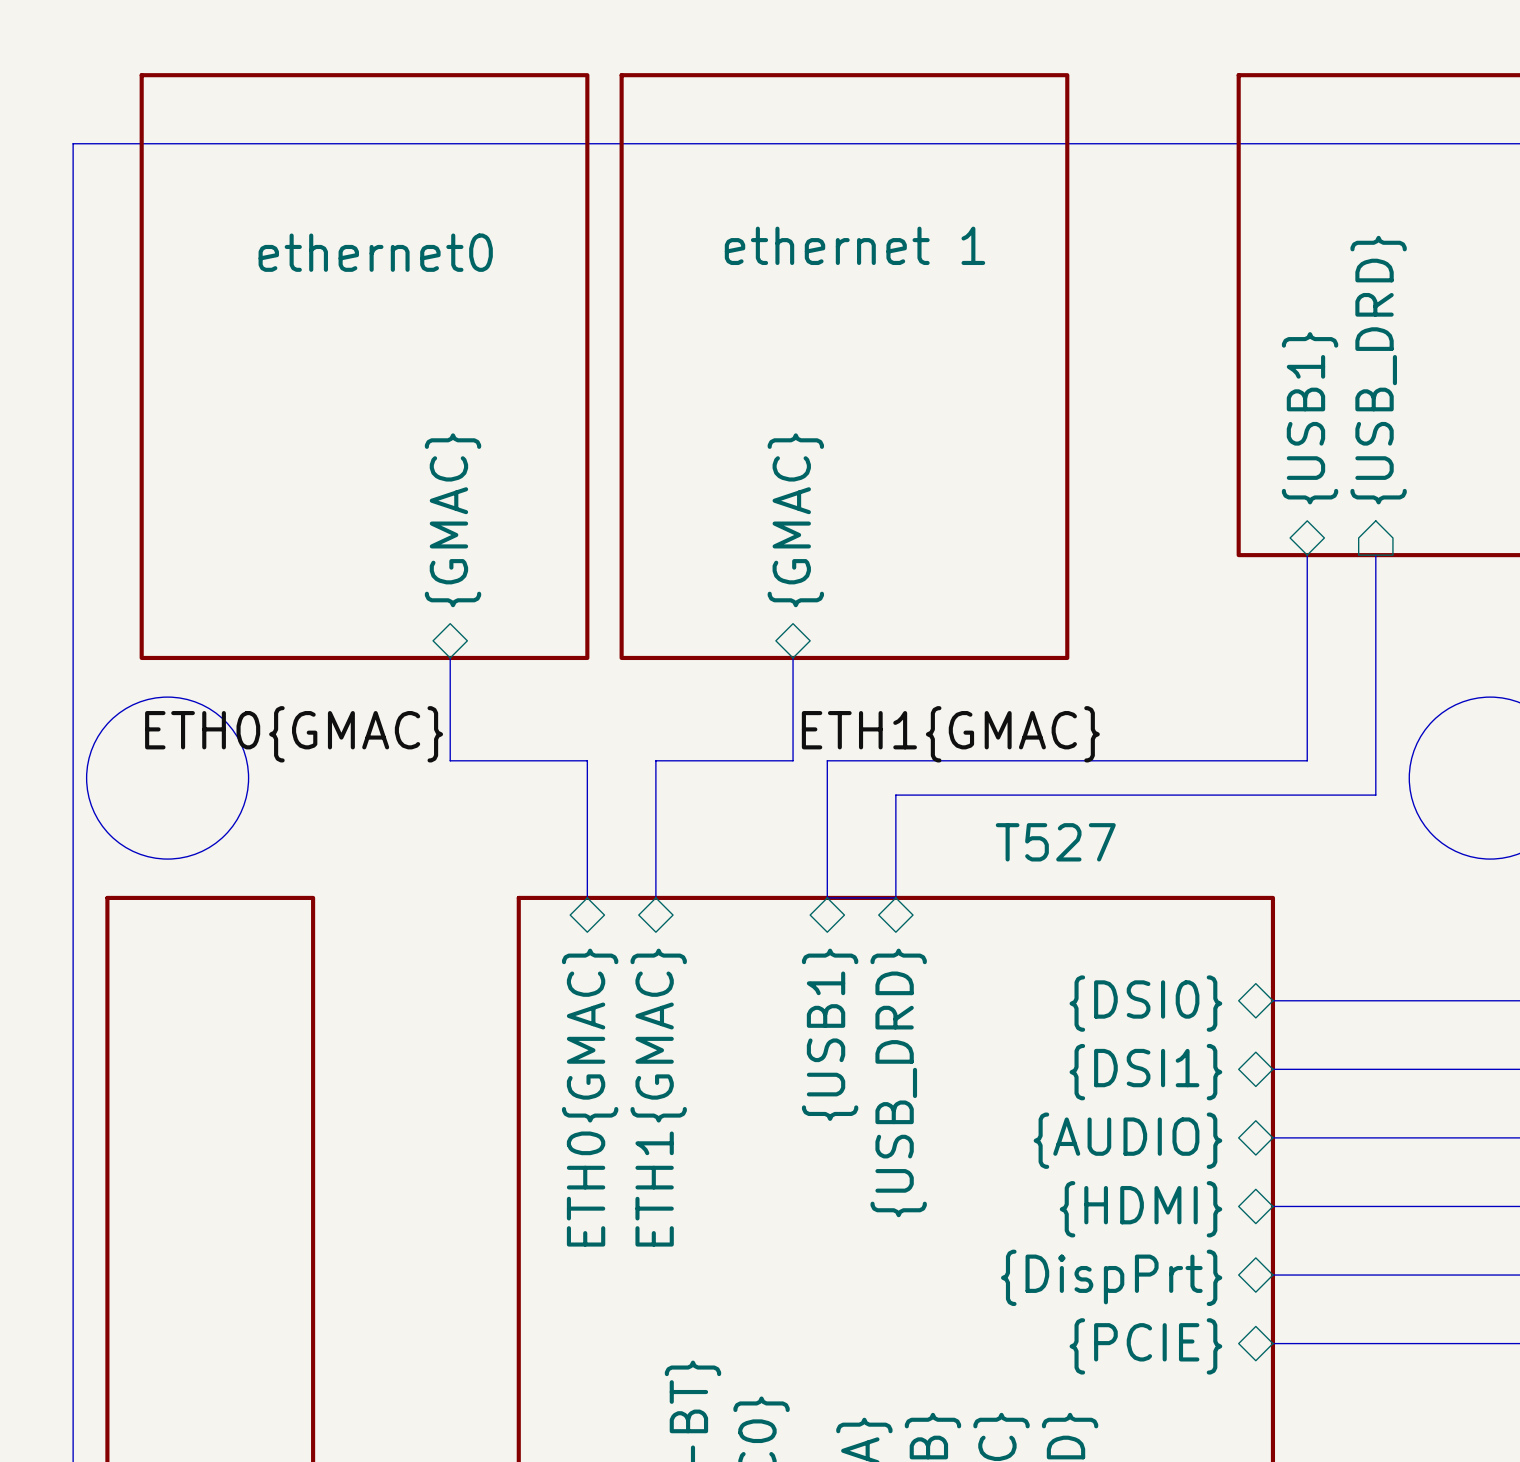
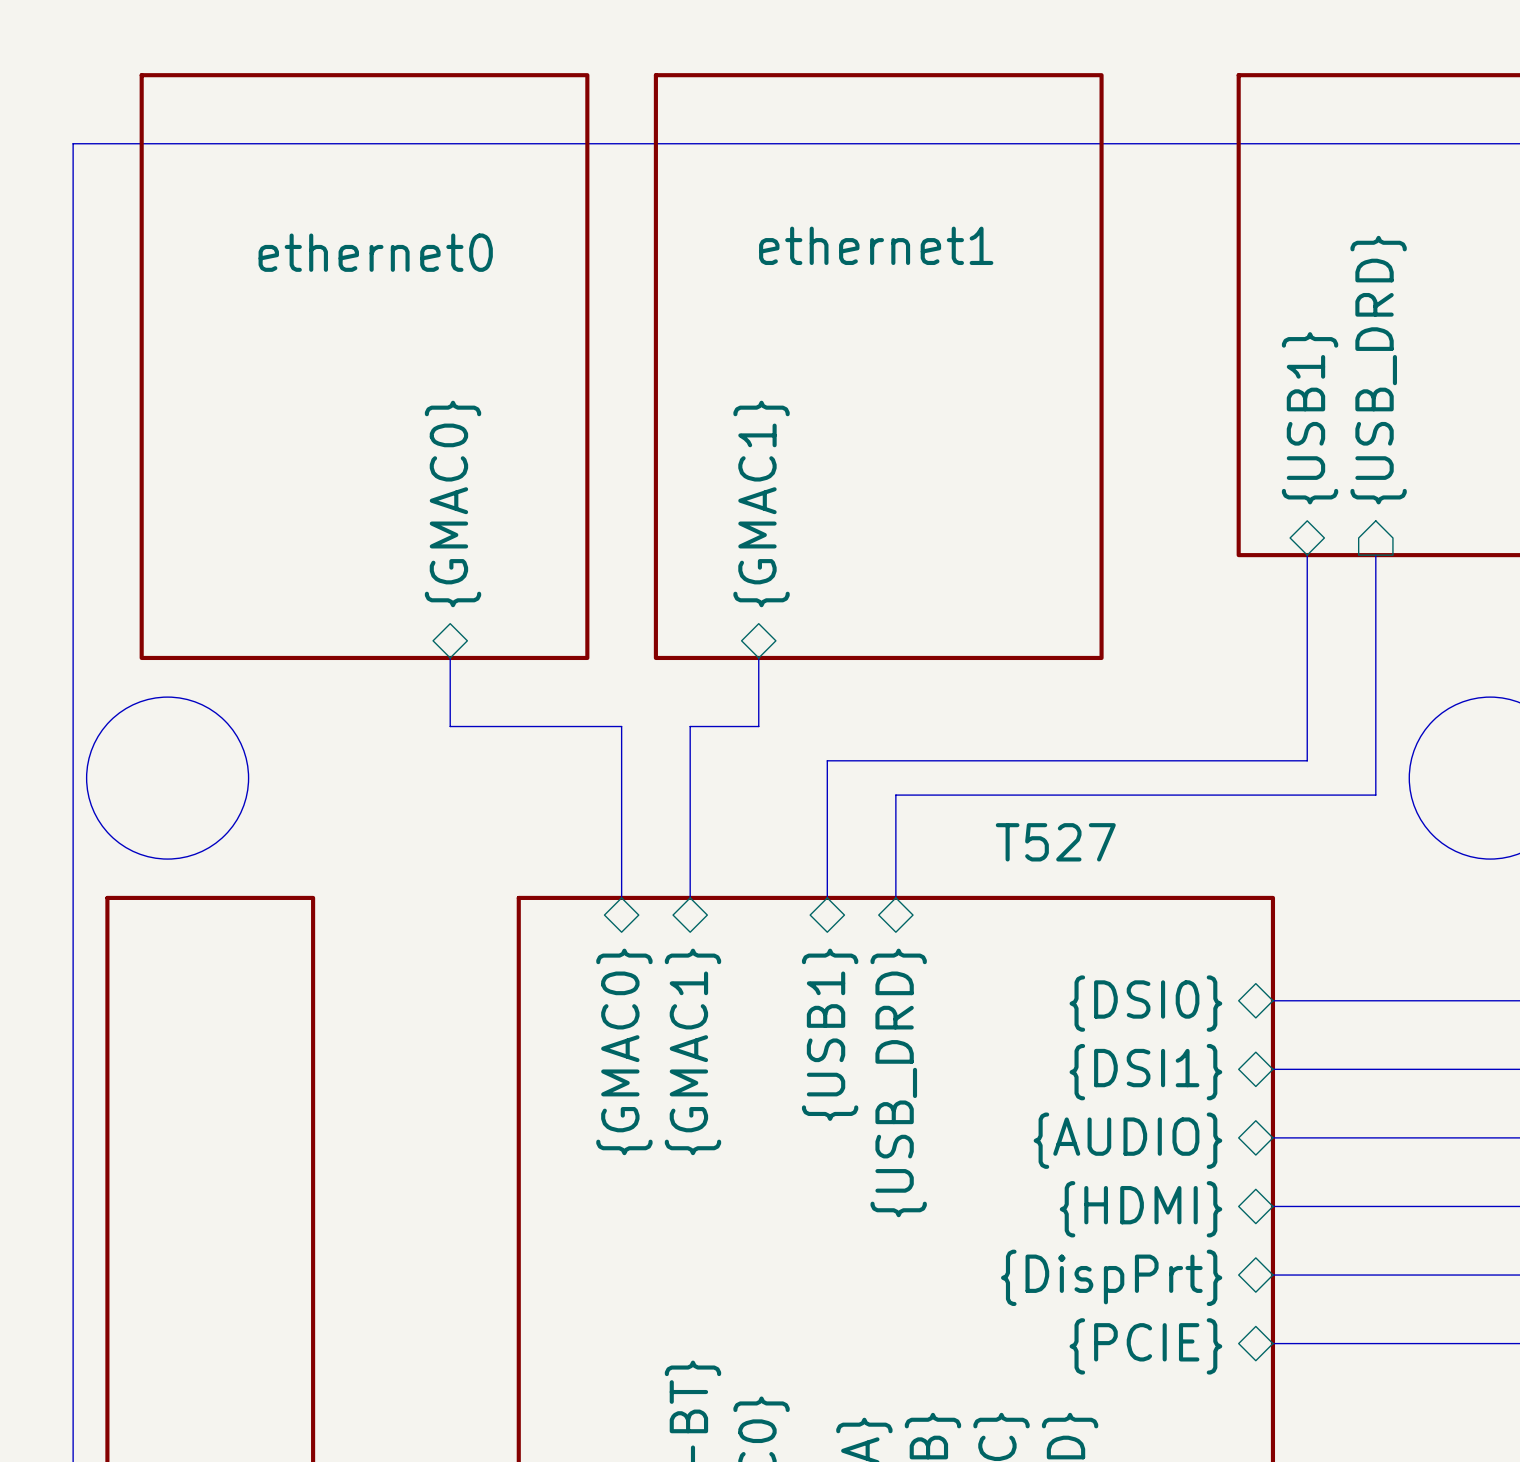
sheet ethernet 1: (844, 366) -> none
sheet ethernet1: none -> (878, 366)
sheet pin: {GMAC} (453, 520) -> {GMAC0} (453, 503)
sheet pin: {GMAC} (795, 520) -> {GMAC1} (761, 503)
bus: none -> (758, 657) (758, 726) (690, 726) (690, 897)
bus: (793, 657) (793, 760) (655, 760) (655, 897) -> none
bus: (450, 726) (450, 760) (587, 760) (587, 897) -> (450, 726) (621, 726) (621, 897)
label: ETH0{GMAC} (294, 734) -> none
label: ETH1{GMAC} (950, 734) -> none
bus: (827, 897) (895, 897) -> none
sheet pin: none -> {GMAC0} (624, 1051)
sheet pin: none -> {GMAC1} (692, 1051)
sheet pin: ETH0{GMAC} (590, 1097) -> none
sheet pin: ETH1{GMAC} (658, 1097) -> none

